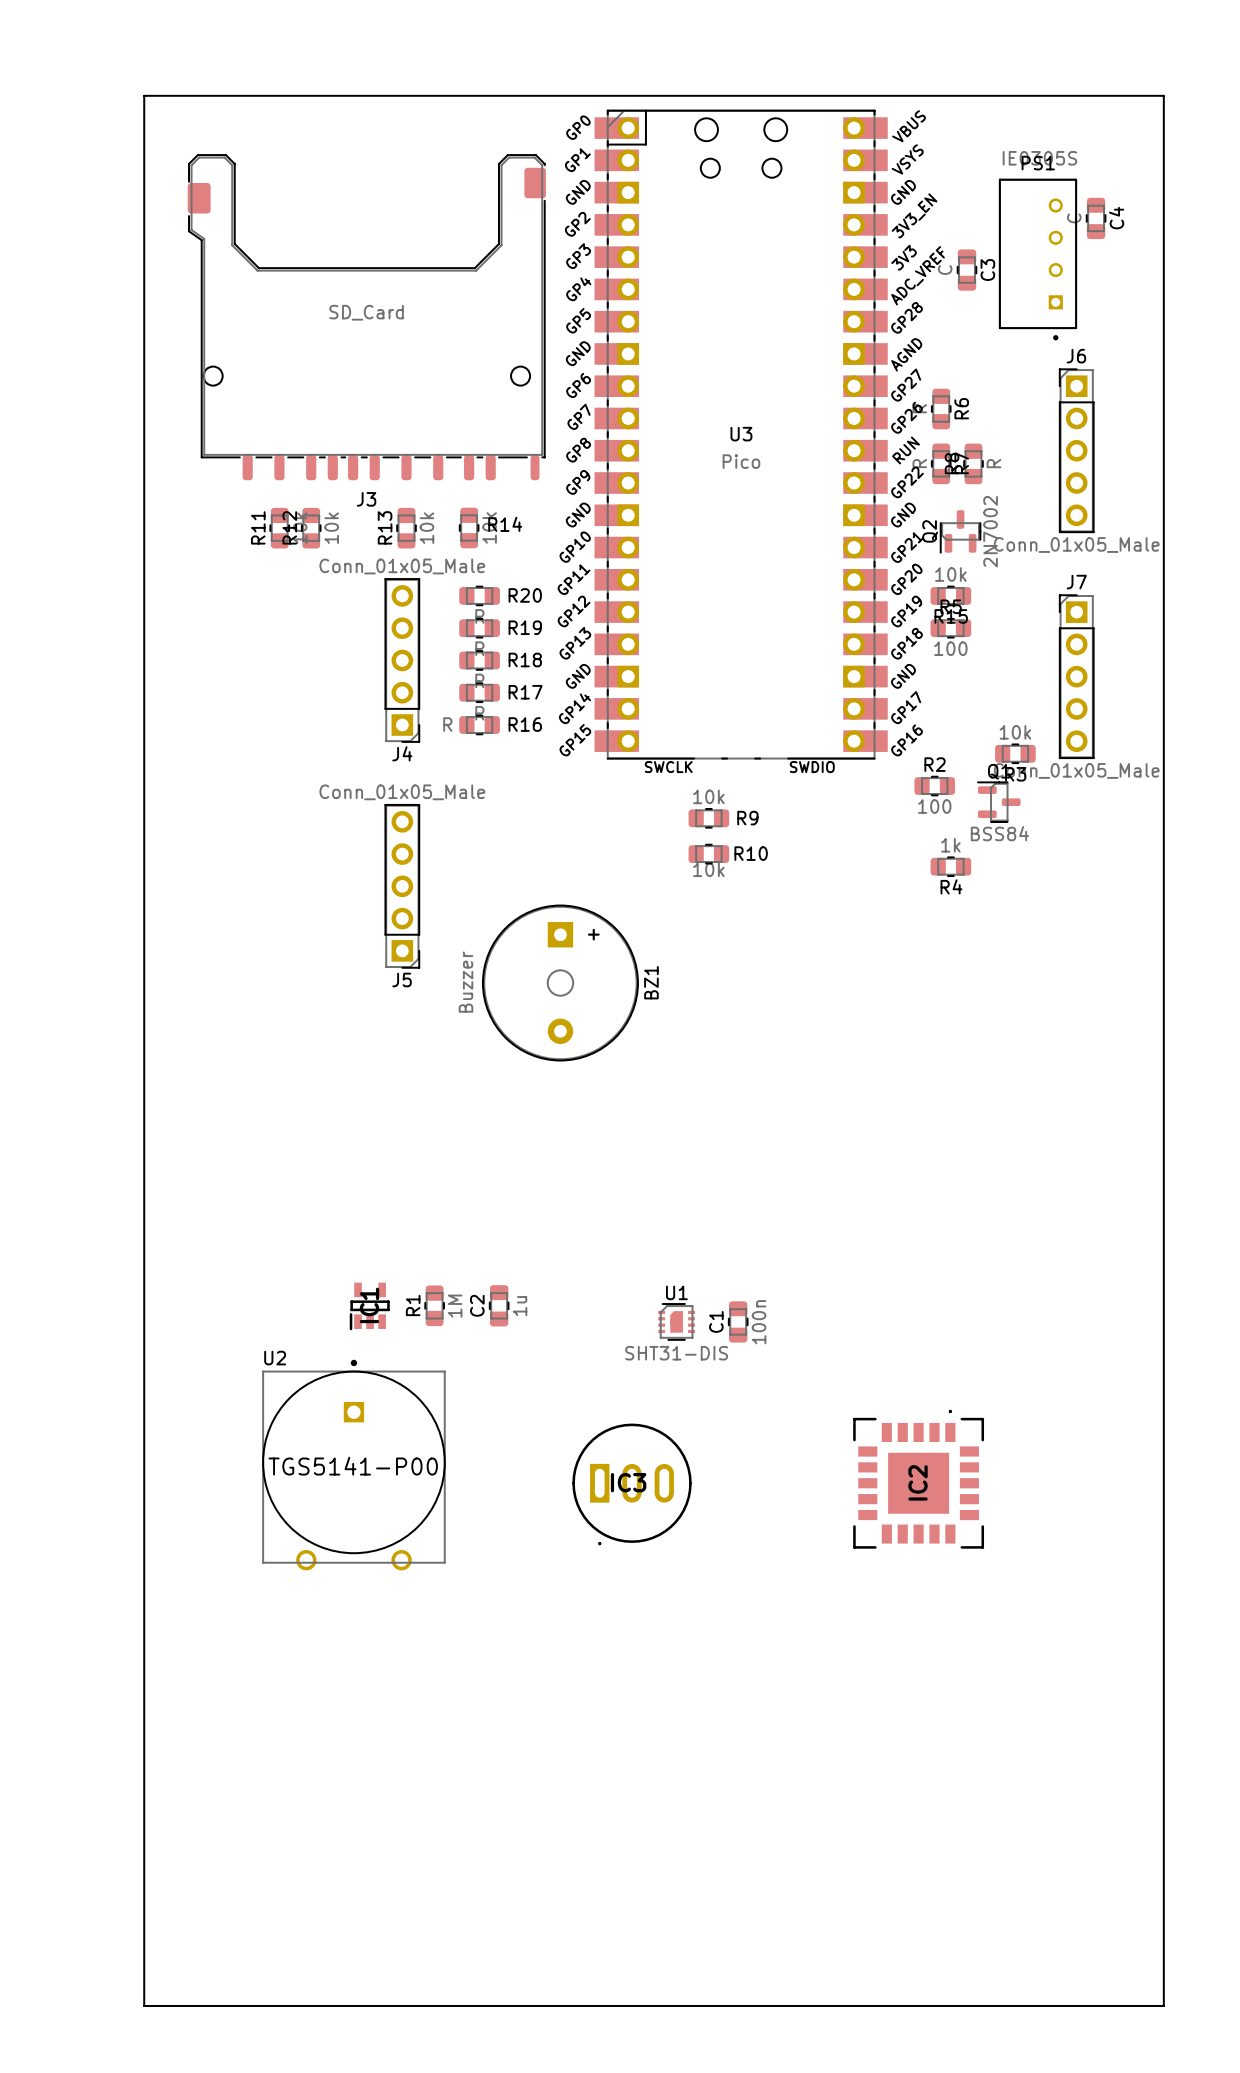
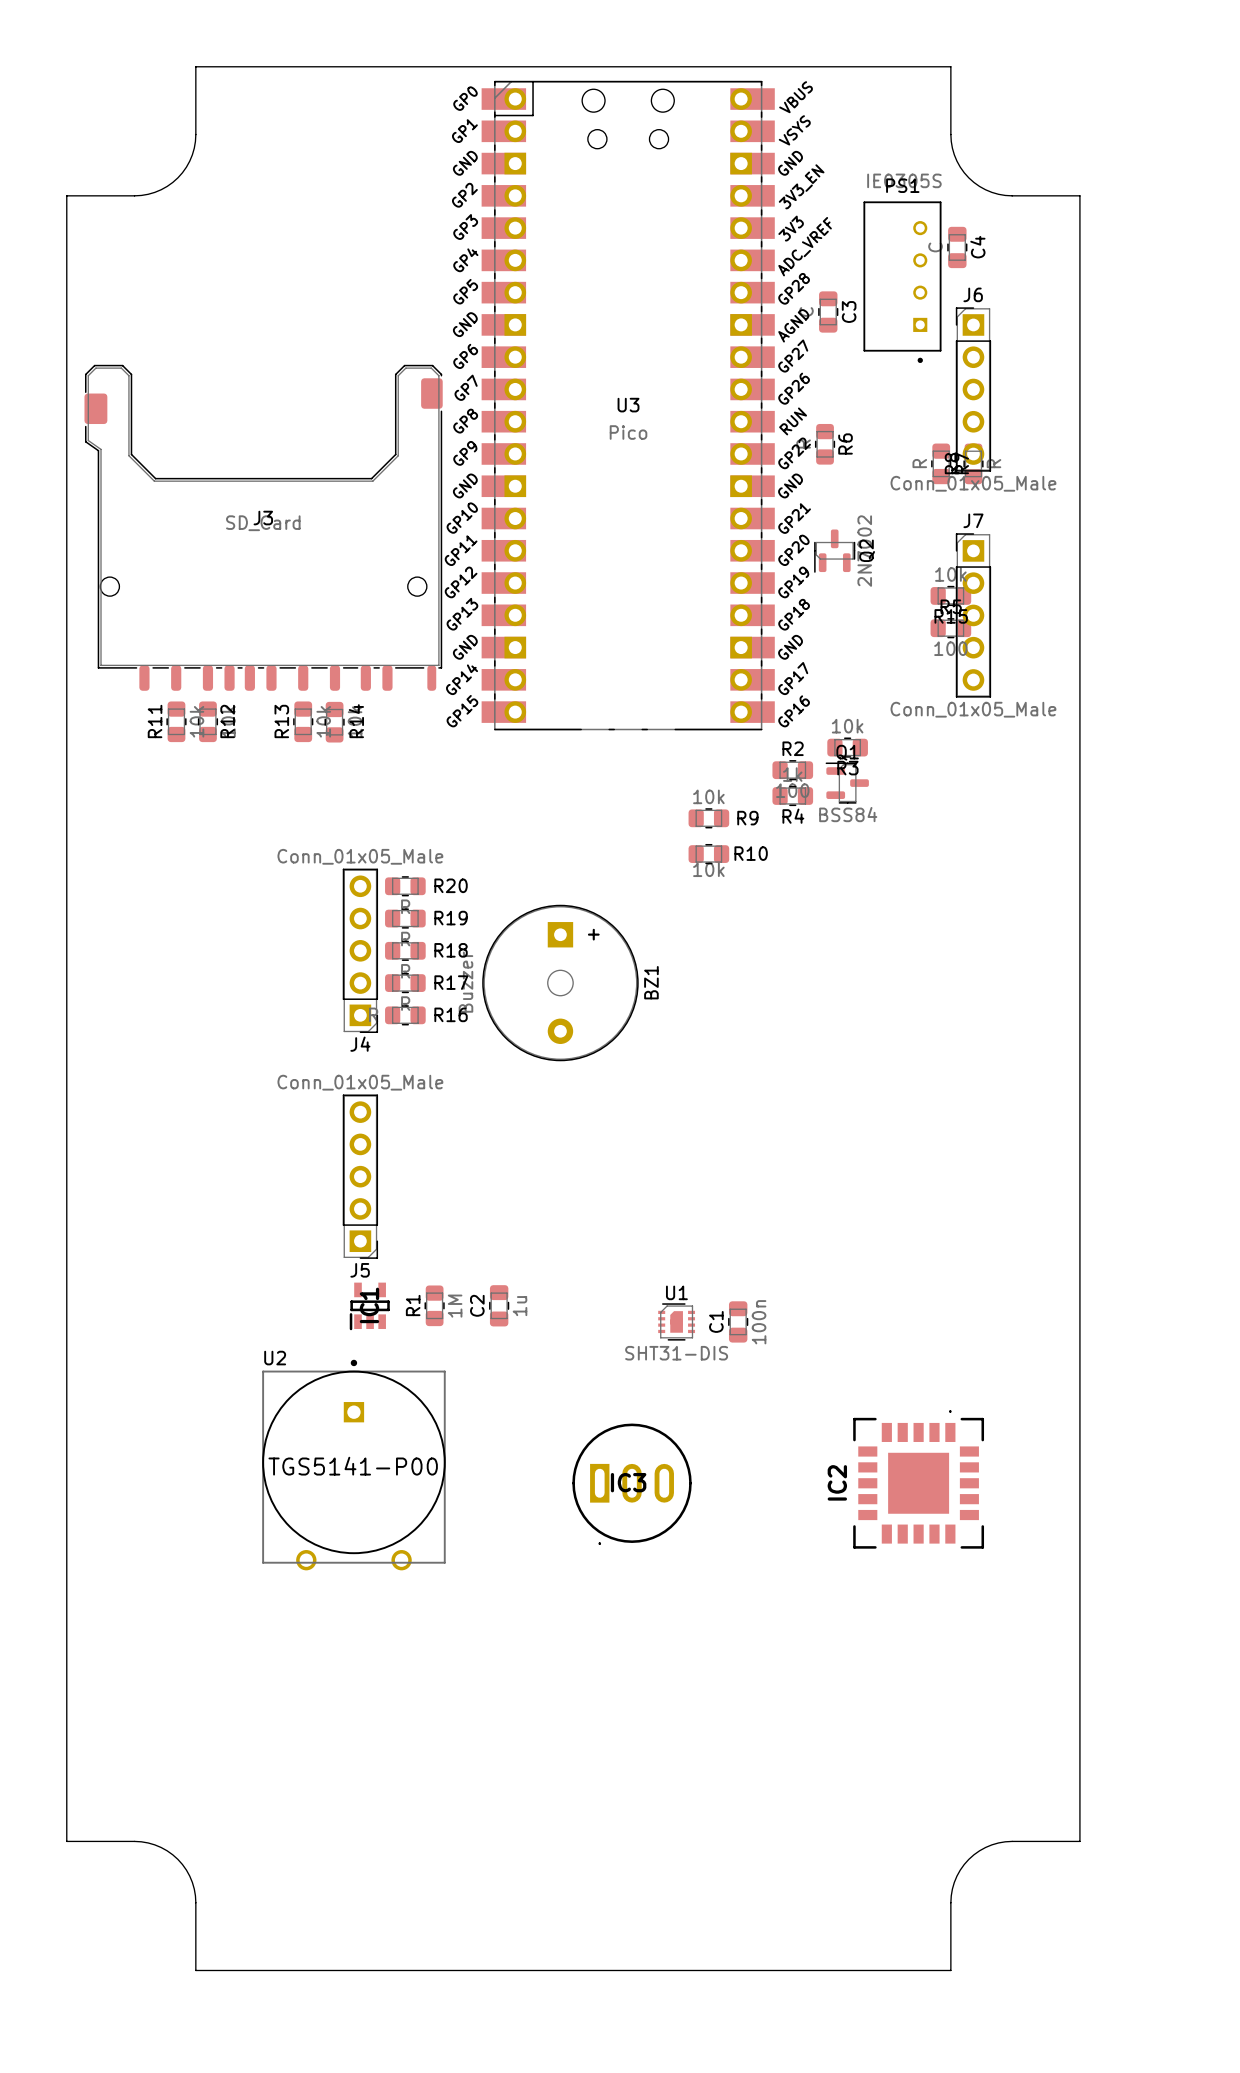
board edge: (144, 95) (1163, 95) (1163, 2005) (144, 2005) (144, 95) -> (195, 66) (195, 141) (189, 161) (177, 177) (161, 189) (141, 195) (66, 195) (66, 1841) (141, 1841) (161, 1847) (177, 1859) (189, 1876) (195, 1895) (195, 1970) (950, 1970) (951, 1895) (956, 1876) (968, 1859) (985, 1847) (1005, 1841) (1079, 1841) (1079, 195) (1005, 195) (985, 189) (968, 177) (956, 161) (951, 141) (950, 66) (195, 66)
C4 position: (1096, 218) -> (957, 247)
PS1 position: (1037, 259) -> (902, 282)
C3 position: (967, 270) -> (828, 312)
J3 position: (366, 317) -> (263, 527)
R6 position: (941, 409) -> (825, 444)
U3 position: (741, 434) -> (628, 405)
J6 position: (1076, 450) -> (973, 389)
J3 name position: J3 (366, 499) -> J3 (263, 518)
R14 name rotation: 0° (505, 524) -> 90° counterclockwise (356, 721)
R12 name position: R12 (289, 527) -> R12 (227, 721)
R14 position: (469, 527) -> (334, 722)
R11 position: (279, 528) -> (176, 721)
R12 position: (311, 528) -> (207, 721)
R13 position: (406, 528) -> (303, 721)
Q2 name position: Q2 (930, 531) -> Q2 (867, 550)
Q2 position: (960, 531) -> (834, 551)
R20 position: (479, 595) -> (405, 886)
R19 position: (479, 628) -> (405, 918)
J4 position: (402, 660) -> (360, 950)
R18 position: (479, 660) -> (405, 950)
J7 position: (1076, 676) -> (973, 615)
R17 position: (479, 692) -> (405, 983)
R16 position: (479, 725) -> (405, 1015)
R3 position: (1015, 753) -> (847, 747)
U3 text: SWCLK (668, 767) -> none
U3 text: SWDIO (812, 767) -> none
R2 position: (934, 786) -> (792, 770)
Q1 position: (998, 802) -> (847, 783)
R4 position: (950, 866) -> (792, 795)
J5 position: (402, 886) -> (360, 1176)
IC2 name position: IC2 (918, 1482) -> IC2 (837, 1482)

